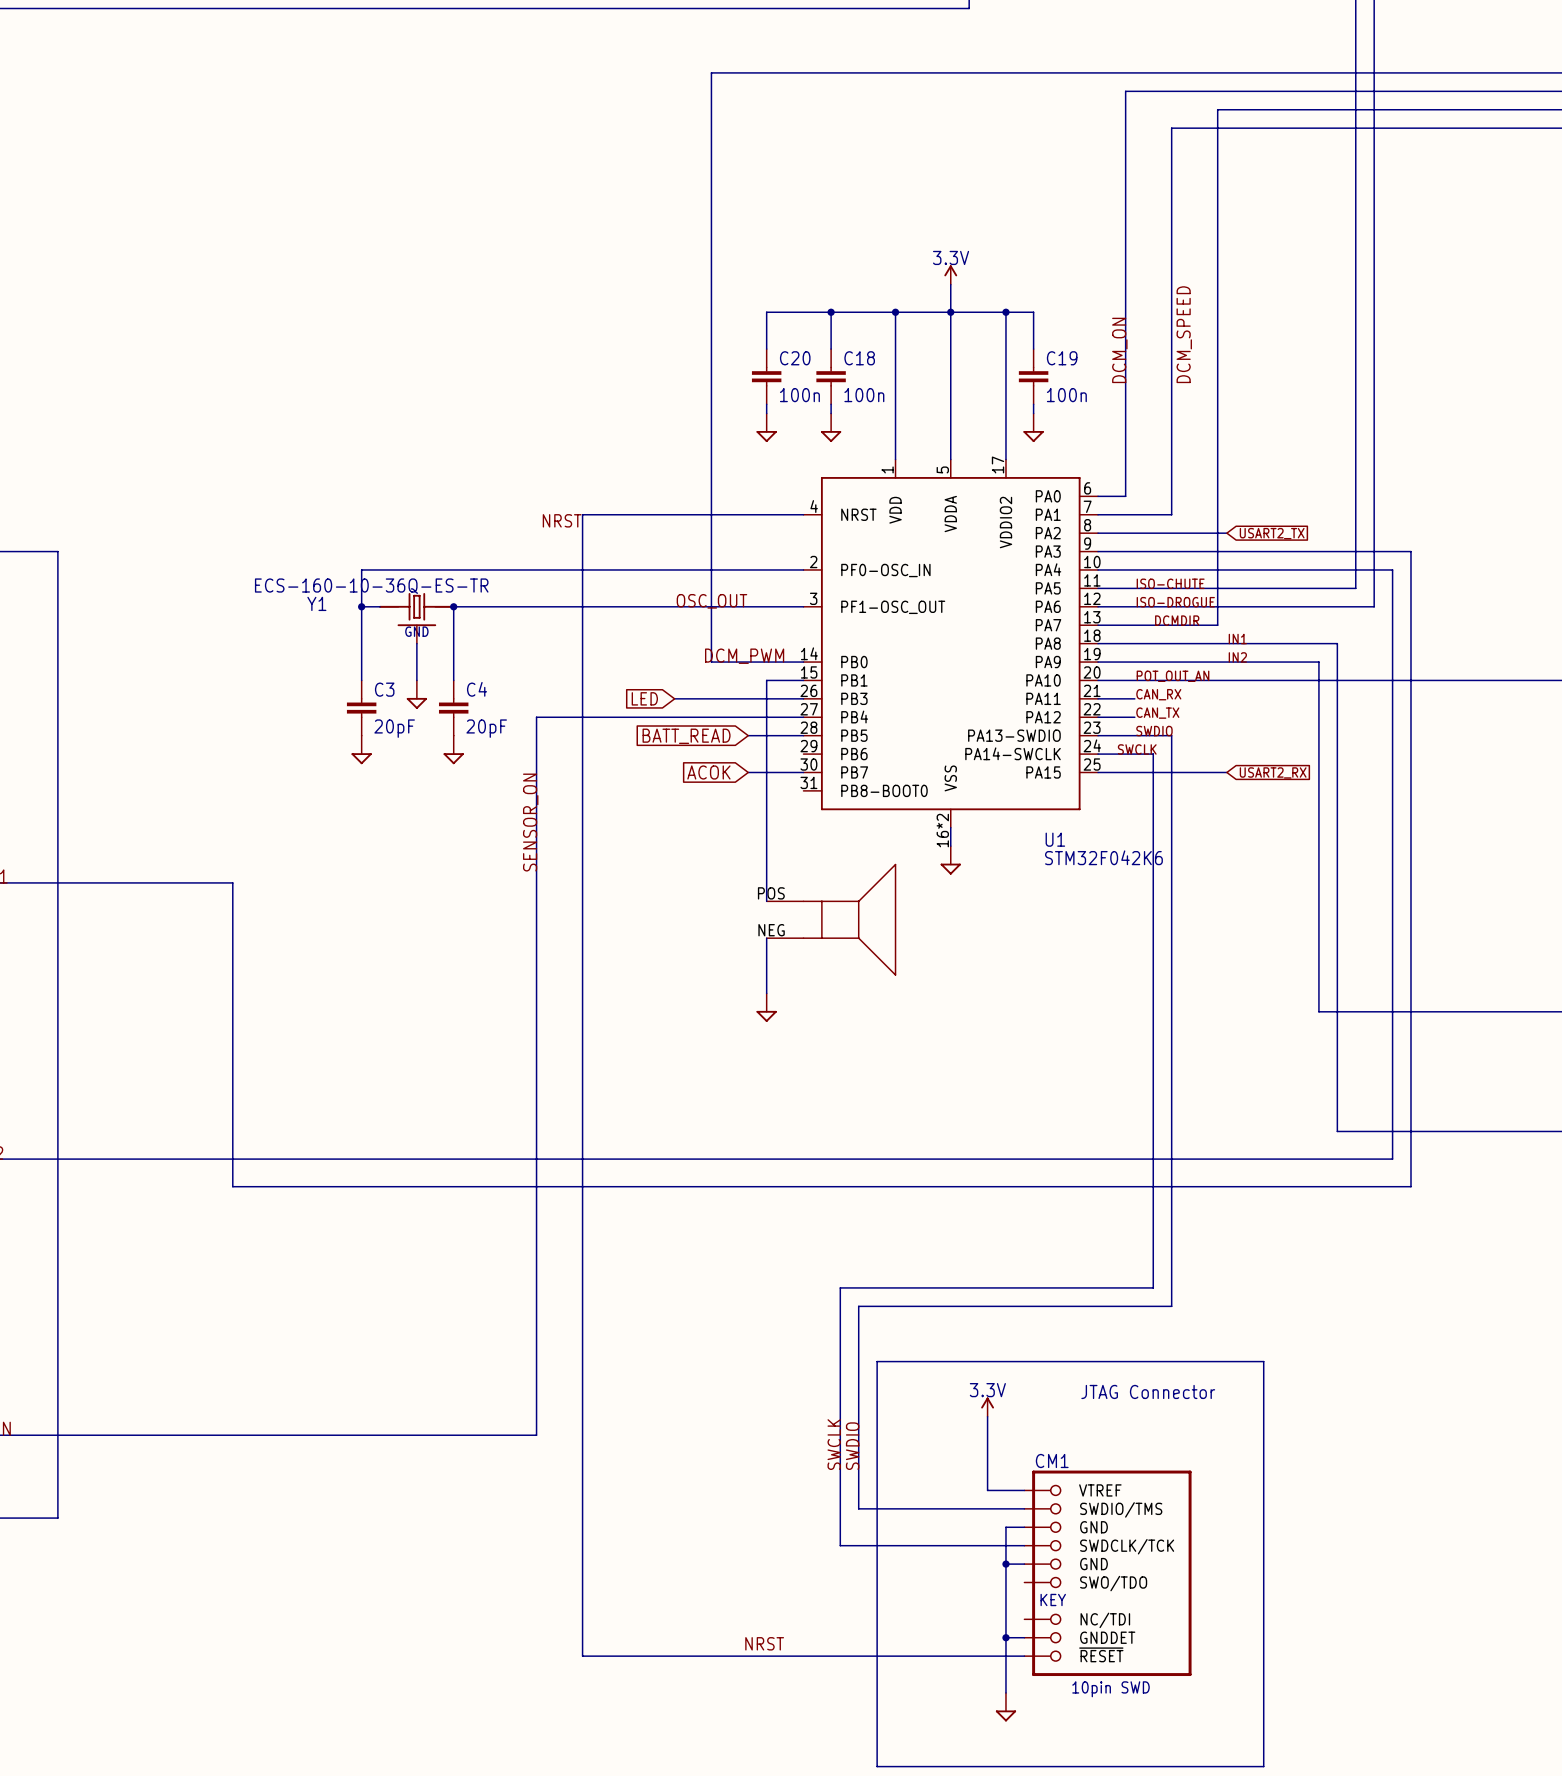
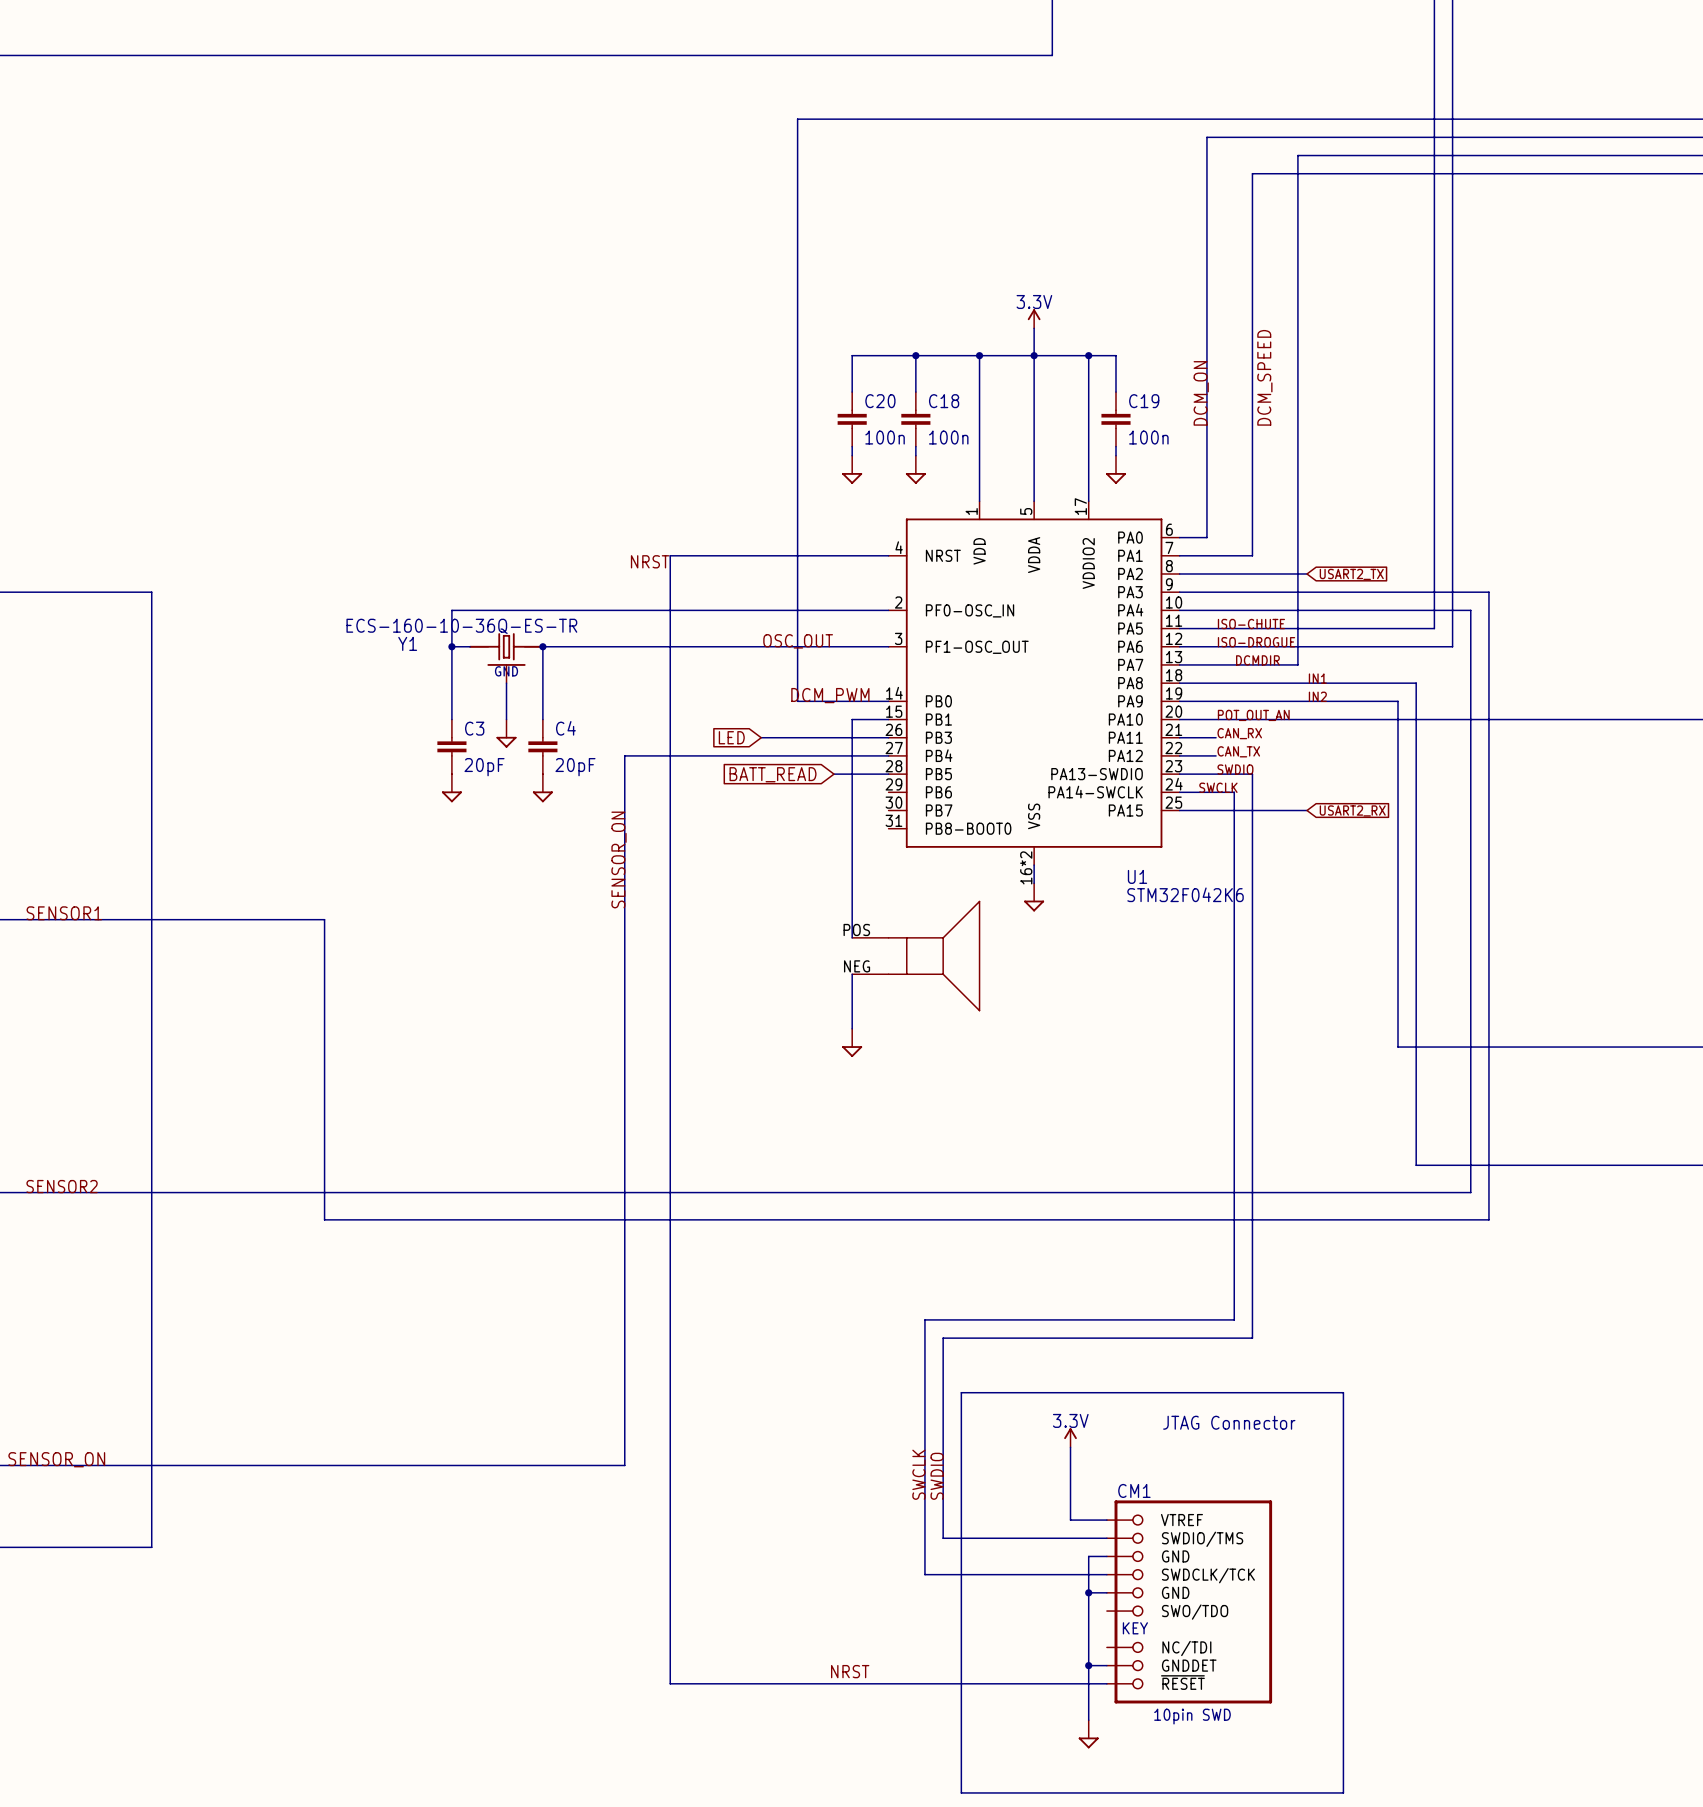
global label: ACOK (708, 772) -> none
wire: (748, 772) (803, 772) -> none

